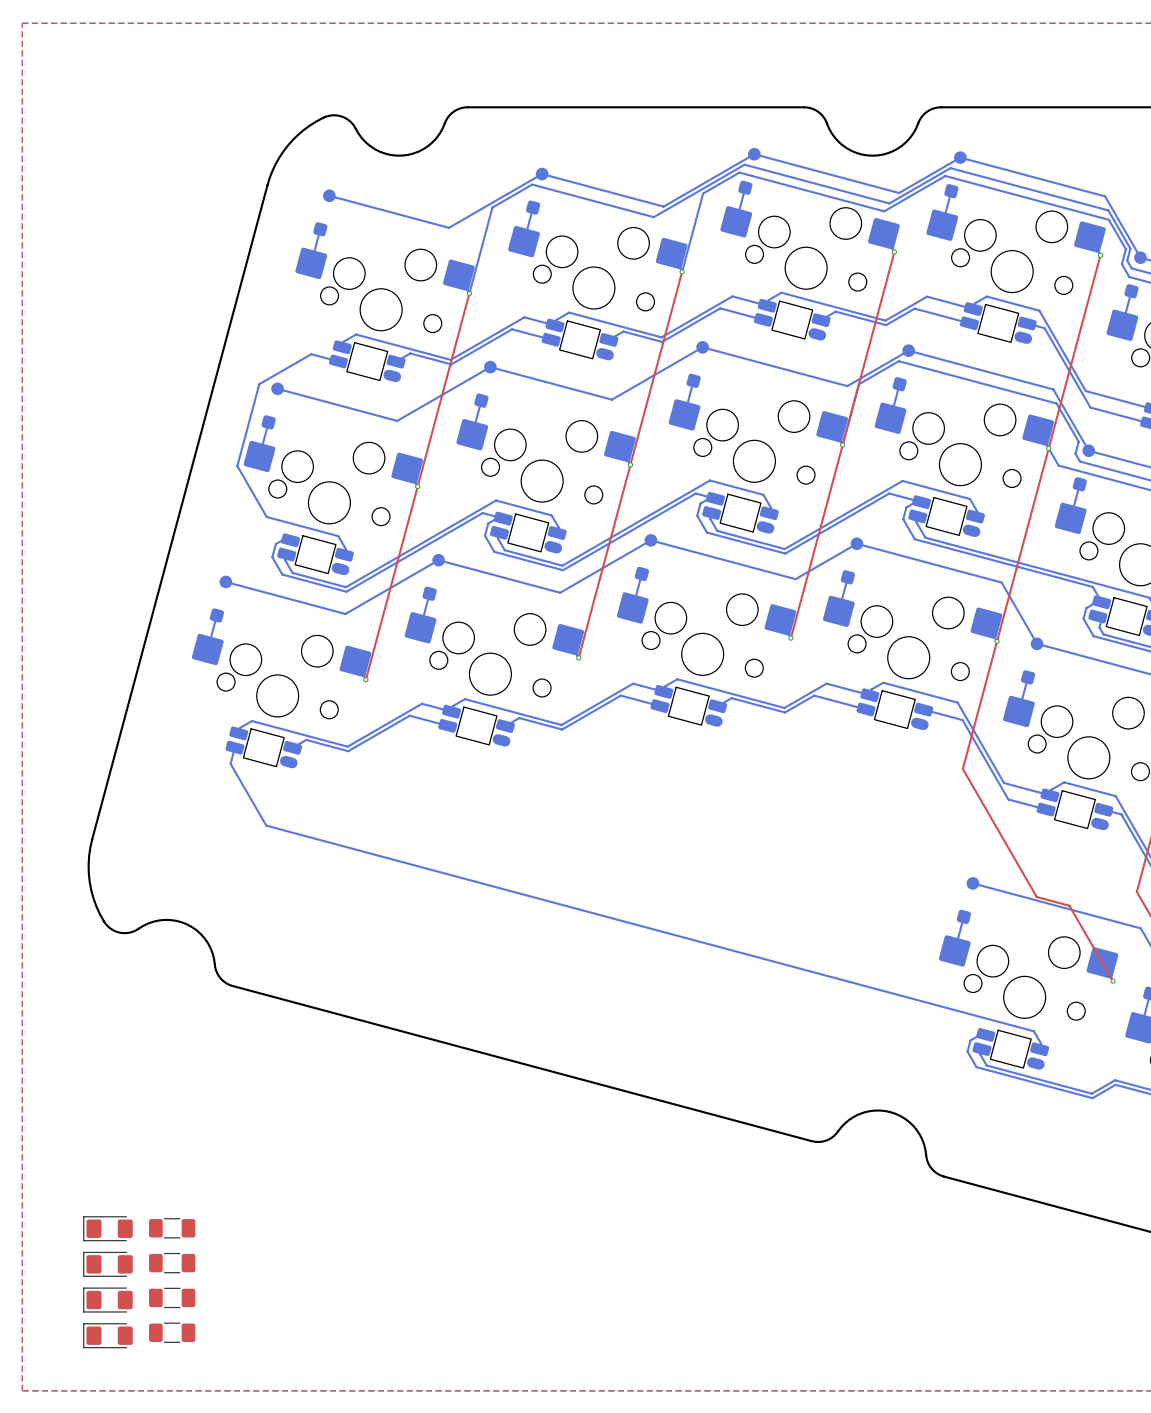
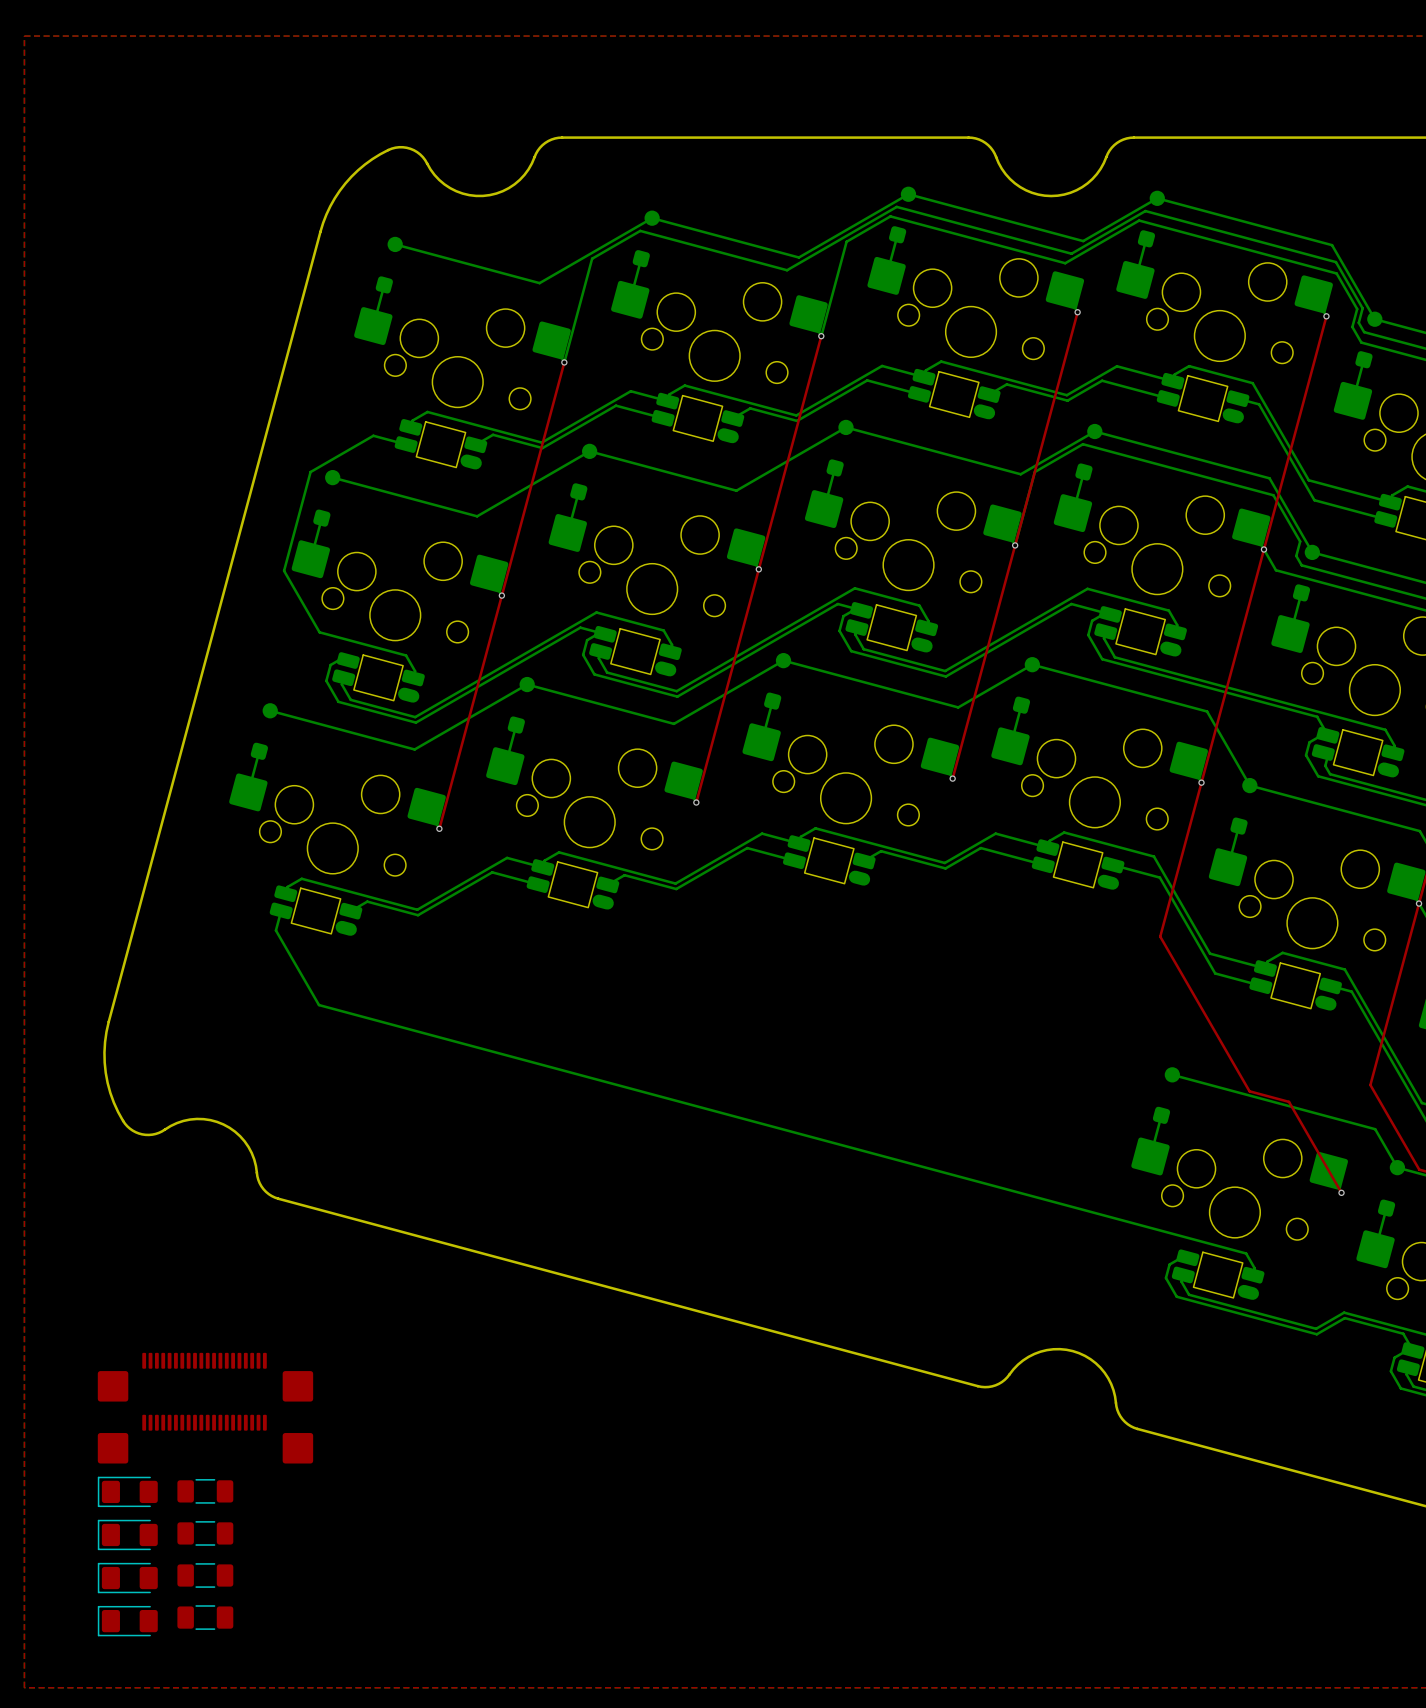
part: none -> (205, 1377)
part: none -> (205, 1439)

